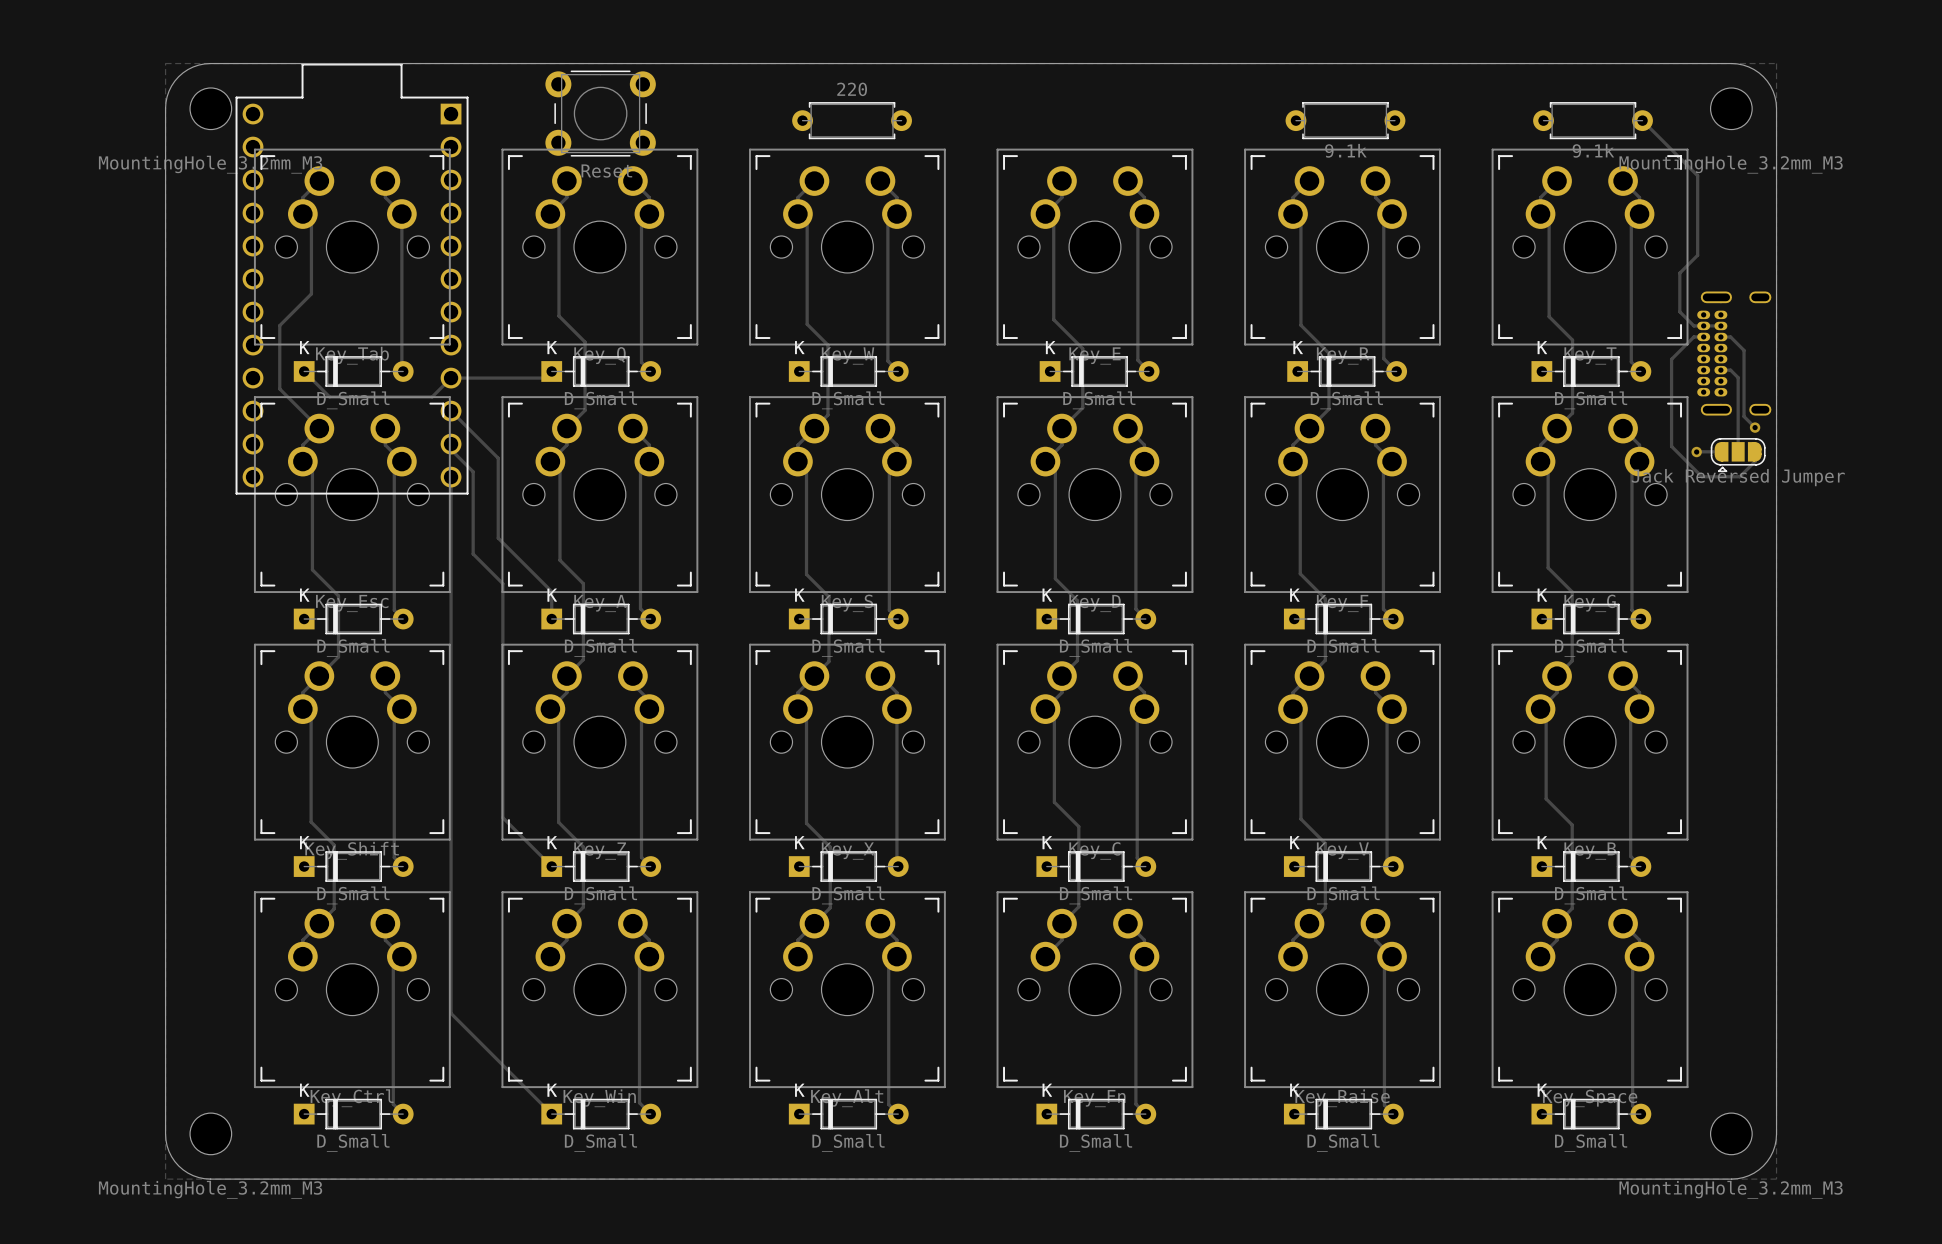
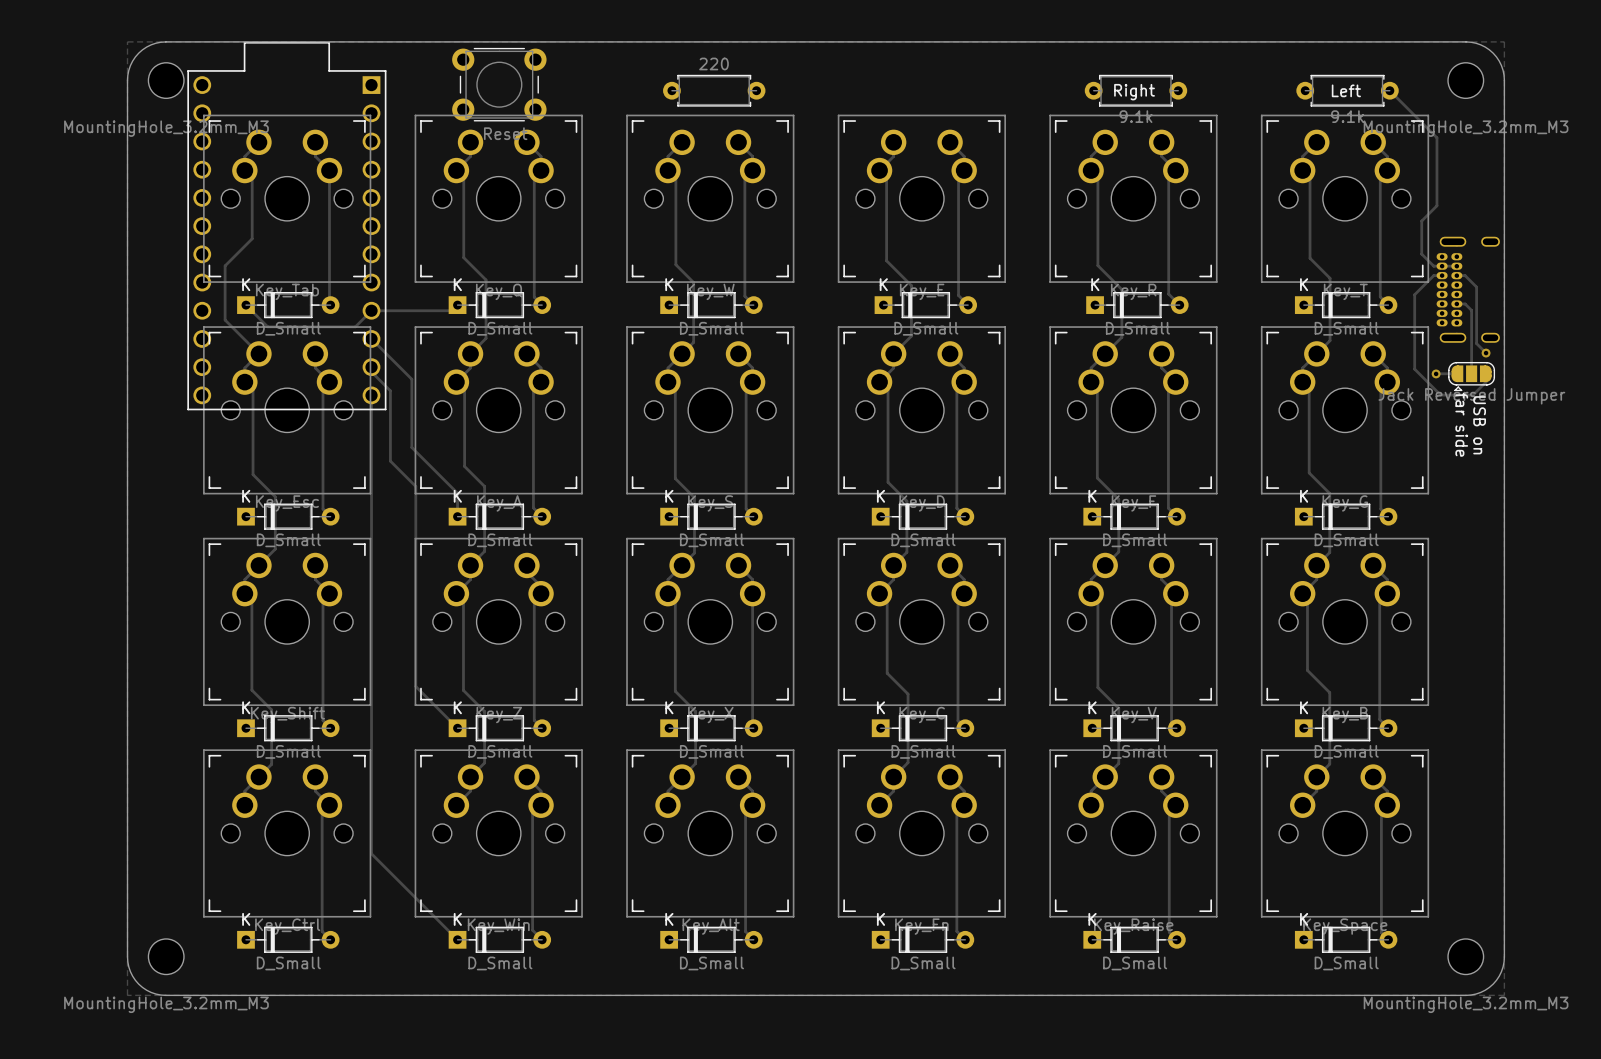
text: none -> Left (1346, 90)
text: none -> Right (1134, 92)
text: none -> USB on (1479, 425)
text: none -> far side (1461, 424)

